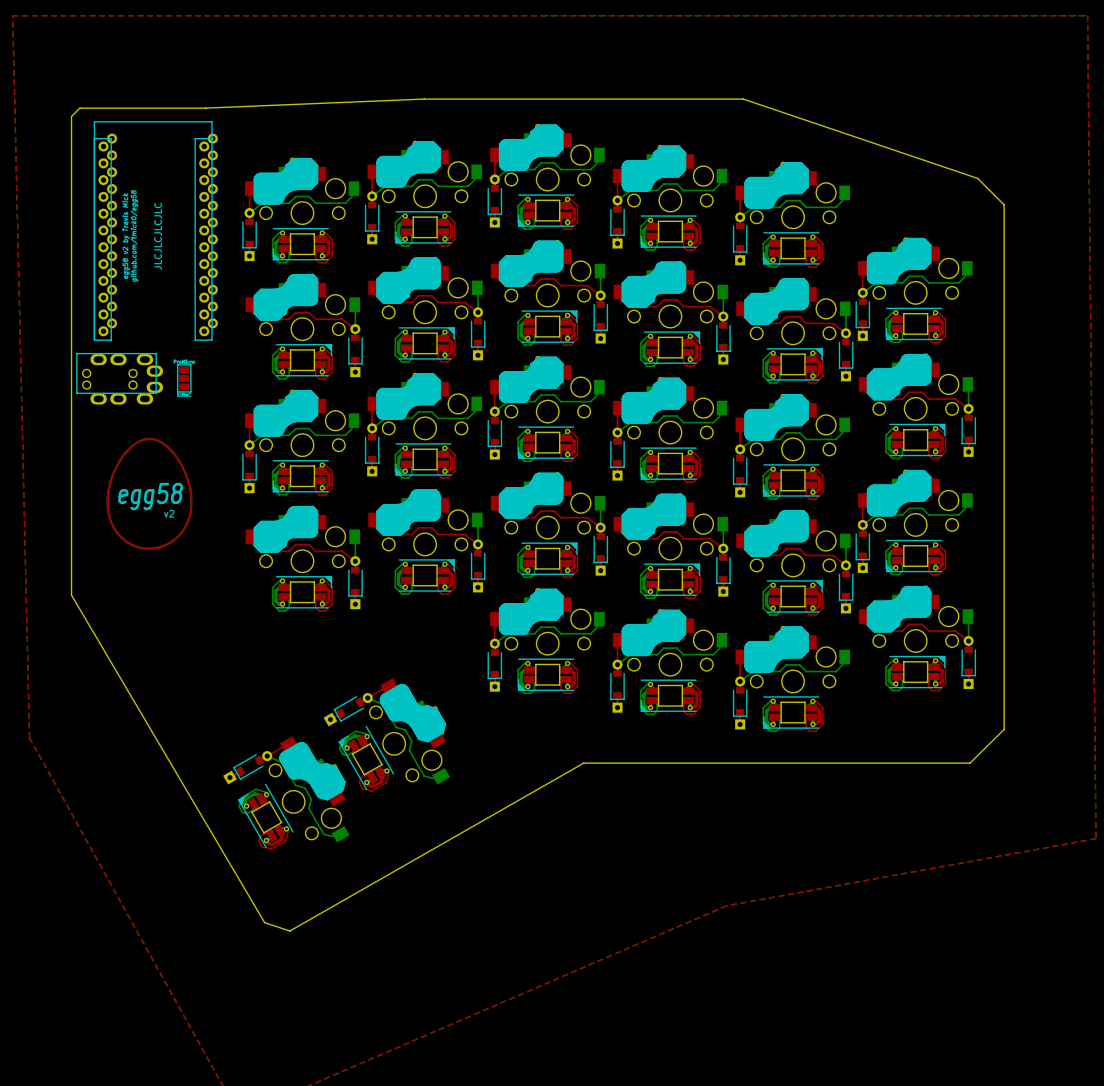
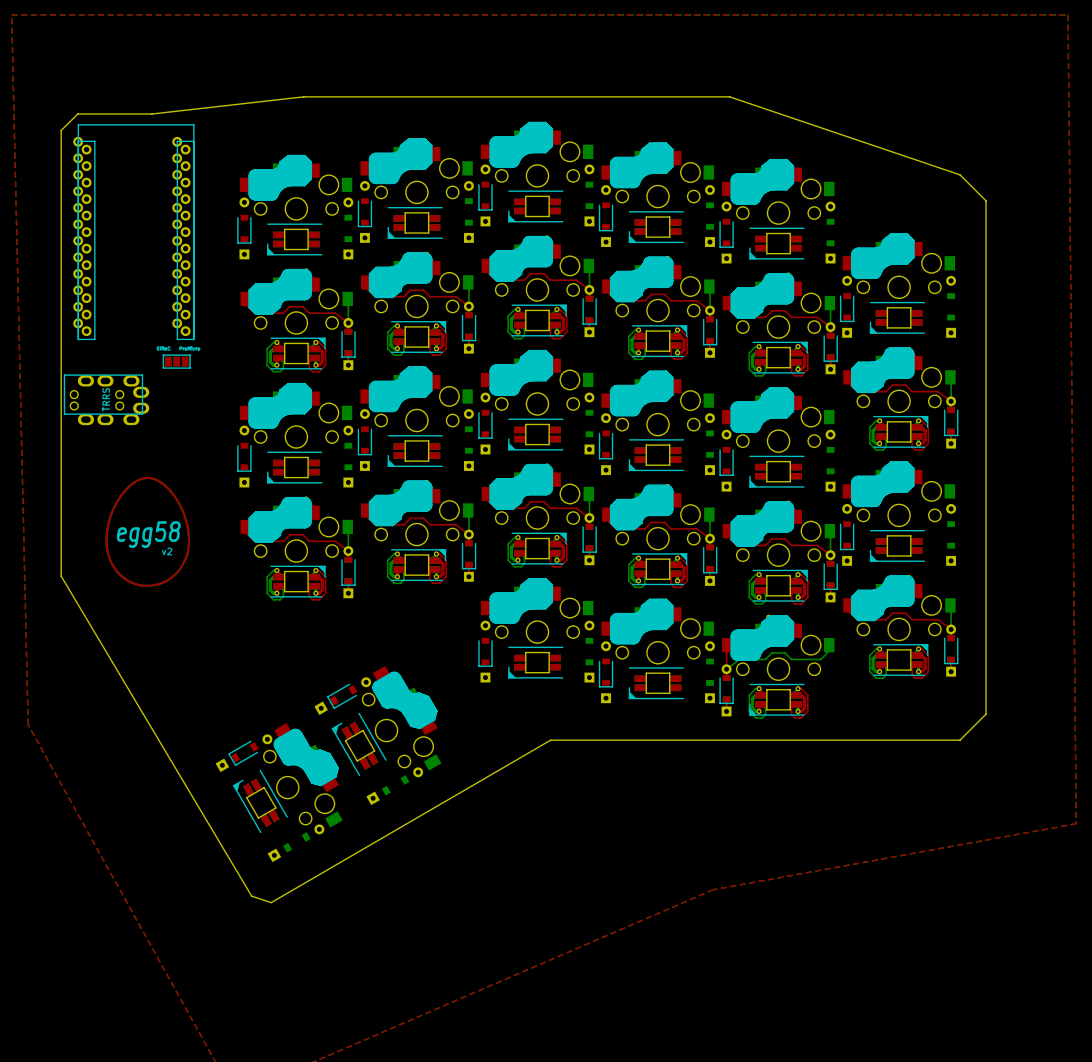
board edge: (424, 99) (205, 108) (79, 108) (71, 116) (71, 595) (264, 922) (289, 931) (583, 763) (970, 763) (1004, 729) (1004, 727) -> (416, 96) (303, 96) (151, 114) (77, 114) (61, 130) (61, 576) (251, 896) (271, 902) (550, 740) (960, 740) (986, 714)
part footprint: [487, 123, 605, 230] -> [478, 121, 595, 227]
part footprint: [365, 140, 482, 247] -> [358, 138, 474, 243]
part footprint: [610, 144, 728, 251] -> [599, 142, 715, 247]
part footprint: [242, 157, 360, 264] -> [237, 154, 354, 260]
part footprint: [733, 161, 850, 268] -> [719, 159, 836, 264]
drawing: [122, 190, 162, 282] -> none
part side: bottom (155, 230) -> top (133, 232)
part footprint: [855, 237, 973, 344] -> [840, 233, 957, 338]
part footprint: [487, 356, 605, 463] -> [478, 350, 595, 455]
part: none -> (176, 361)
part footprint: [365, 372, 482, 479] -> [358, 366, 474, 471]
part footprint: [610, 377, 728, 483] -> [599, 370, 715, 476]
part: (119, 378) -> none
part: (184, 378) -> none
part footprint: [242, 389, 360, 496] -> [237, 383, 354, 488]
part footprint: [733, 393, 850, 500] -> [719, 387, 836, 492]
part: none -> (106, 399)
part footprint: [855, 469, 973, 576] -> [840, 461, 957, 566]
drawing position: (149, 493) -> (147, 531)
part footprint: [487, 588, 605, 695] -> [478, 578, 595, 683]
part footprint: [610, 609, 728, 716] -> [599, 598, 715, 704]
part: (386, 735) -> none
part: none -> (377, 735)
part: (286, 793) -> none
part: none -> (279, 792)

